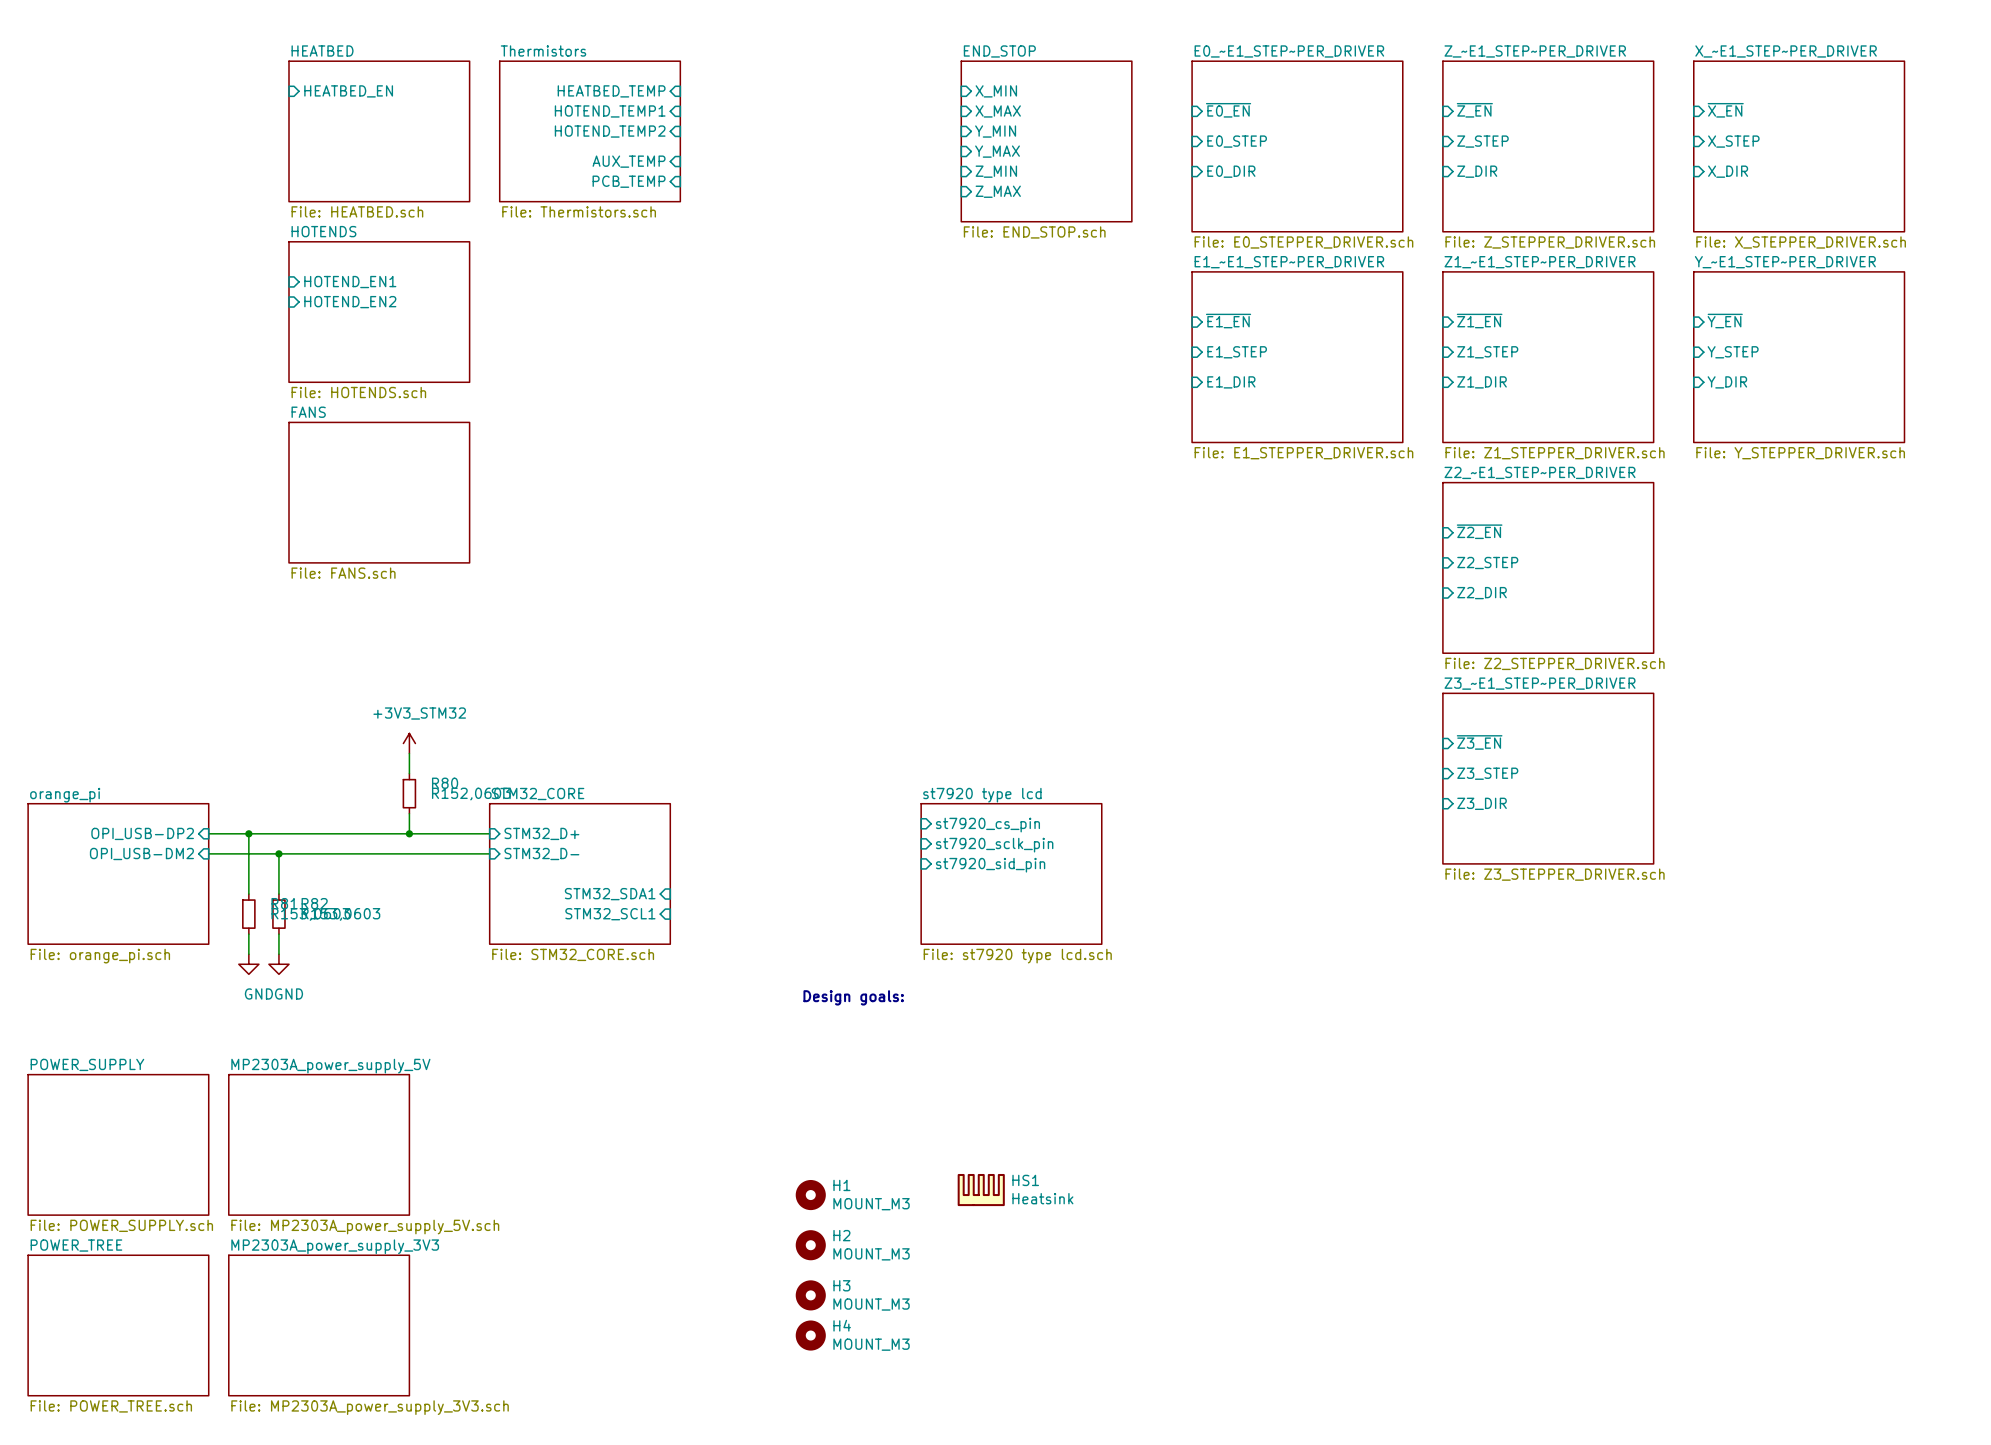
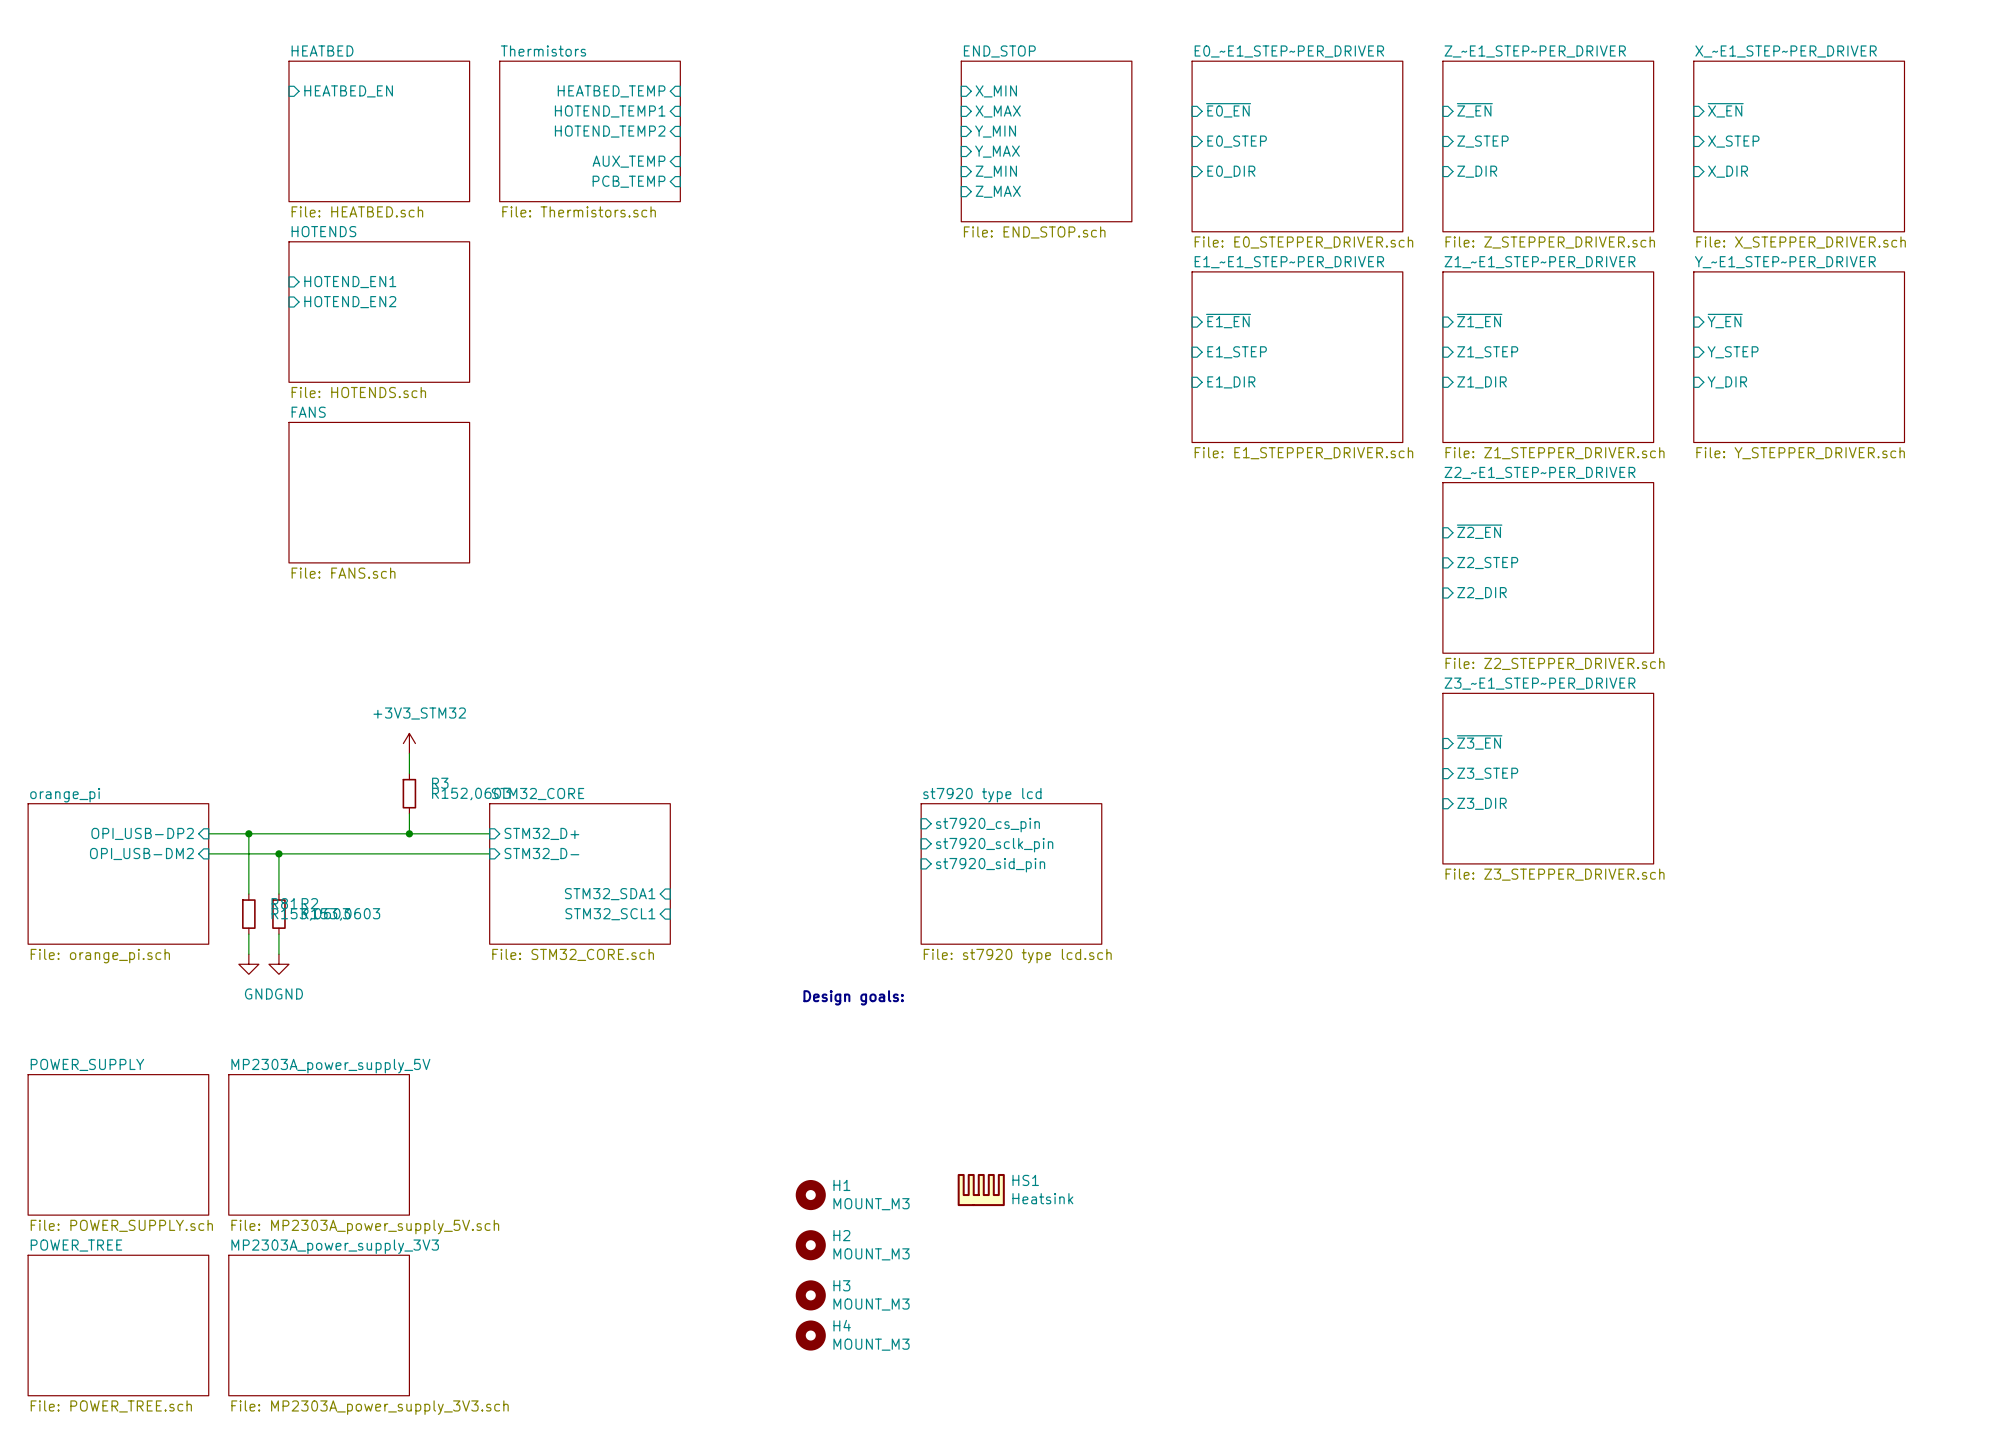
R80 name: R80 (445, 783) -> R3 (440, 783)
R82 name: R82 (314, 903) -> R2 (309, 903)

